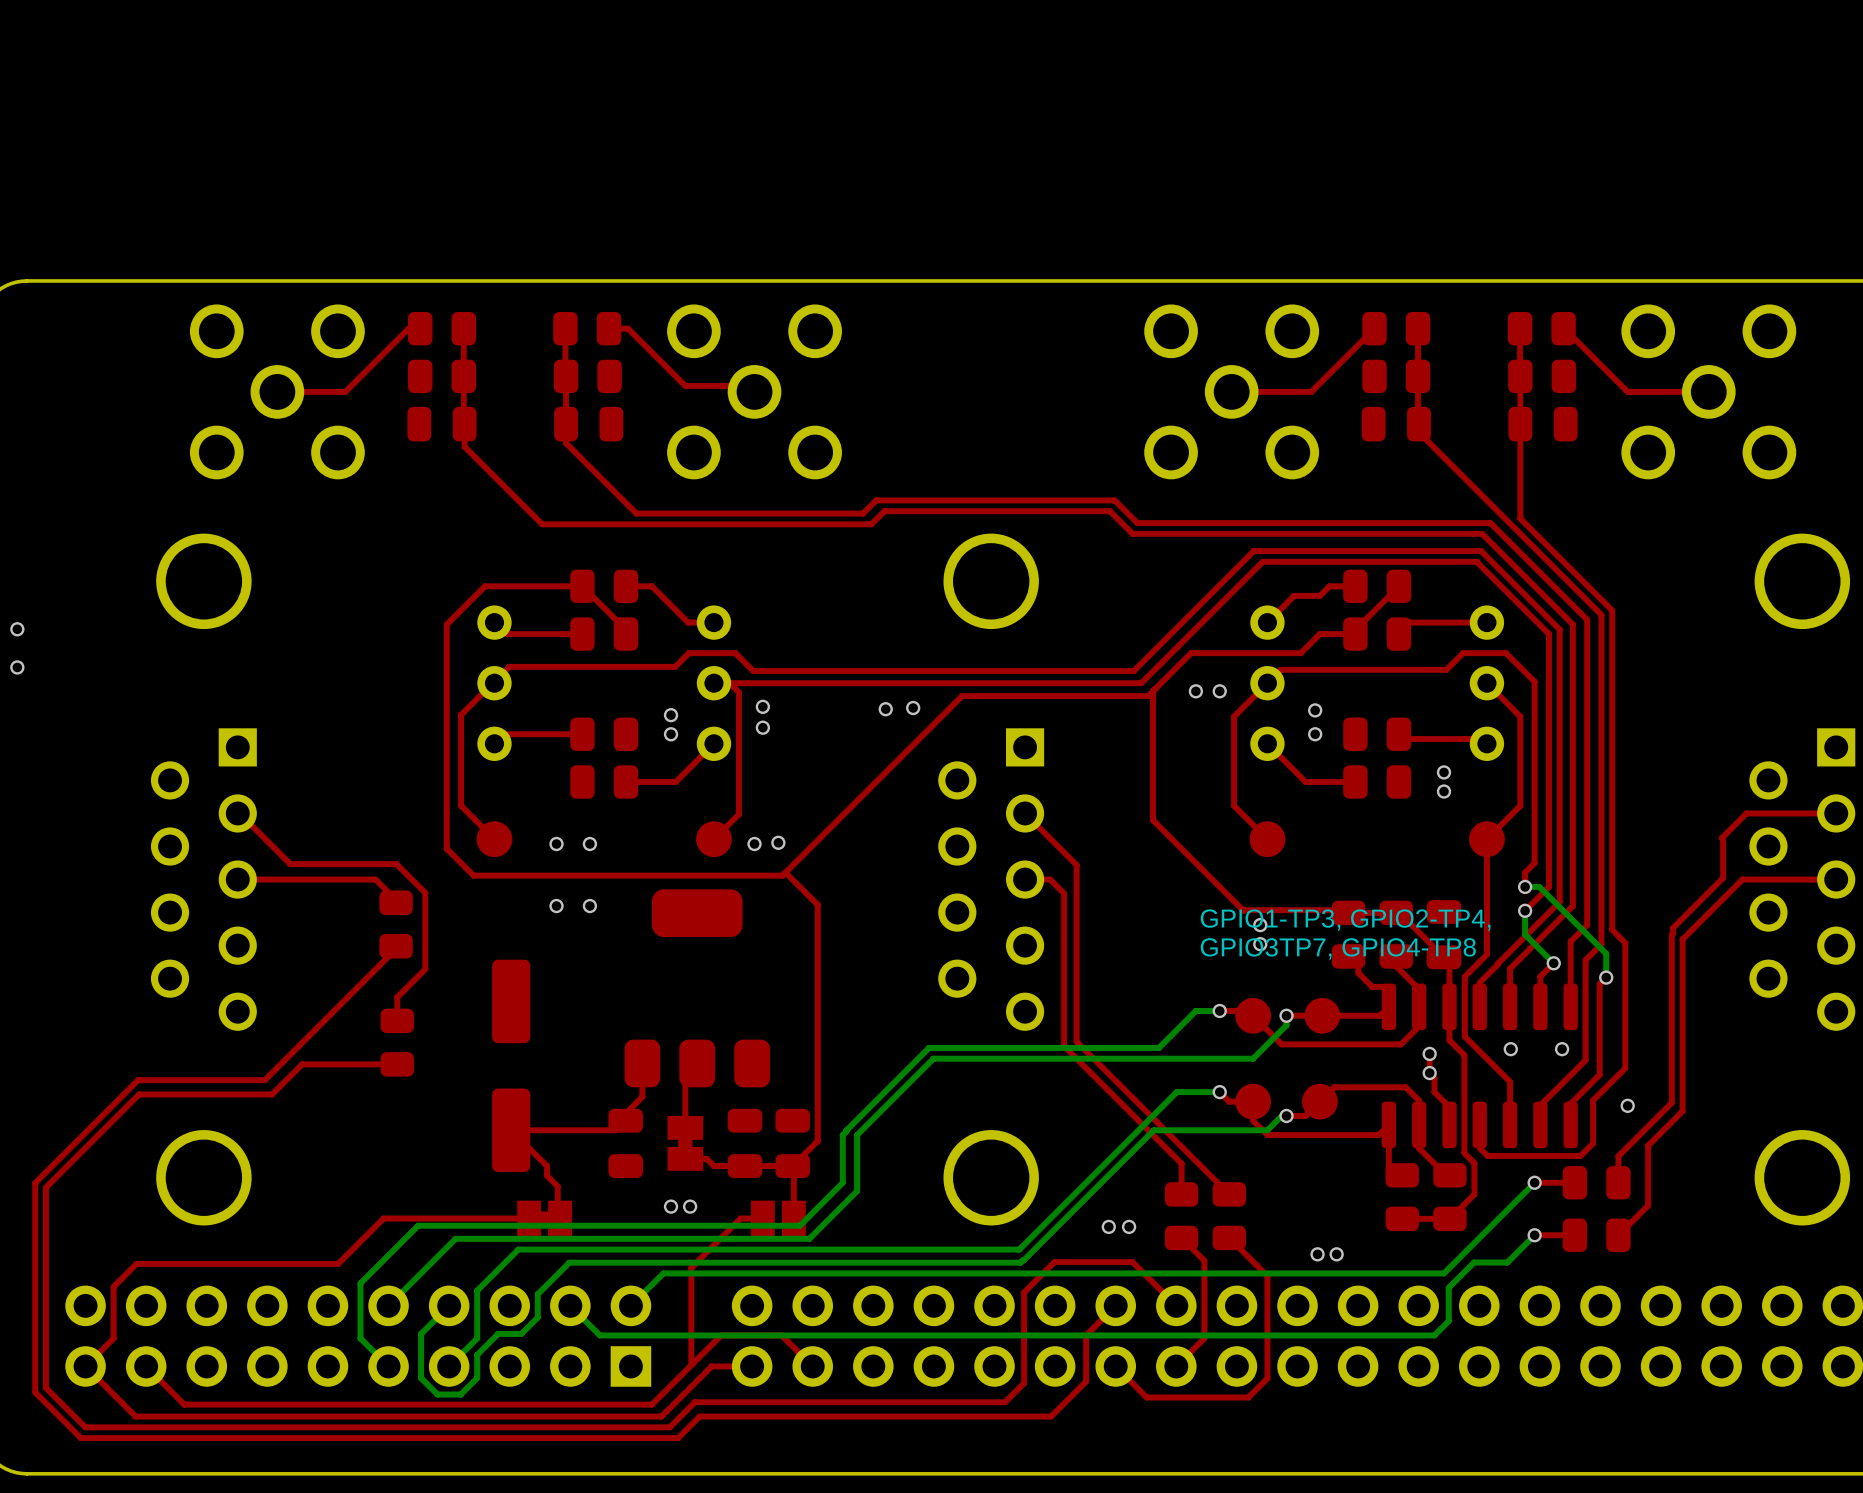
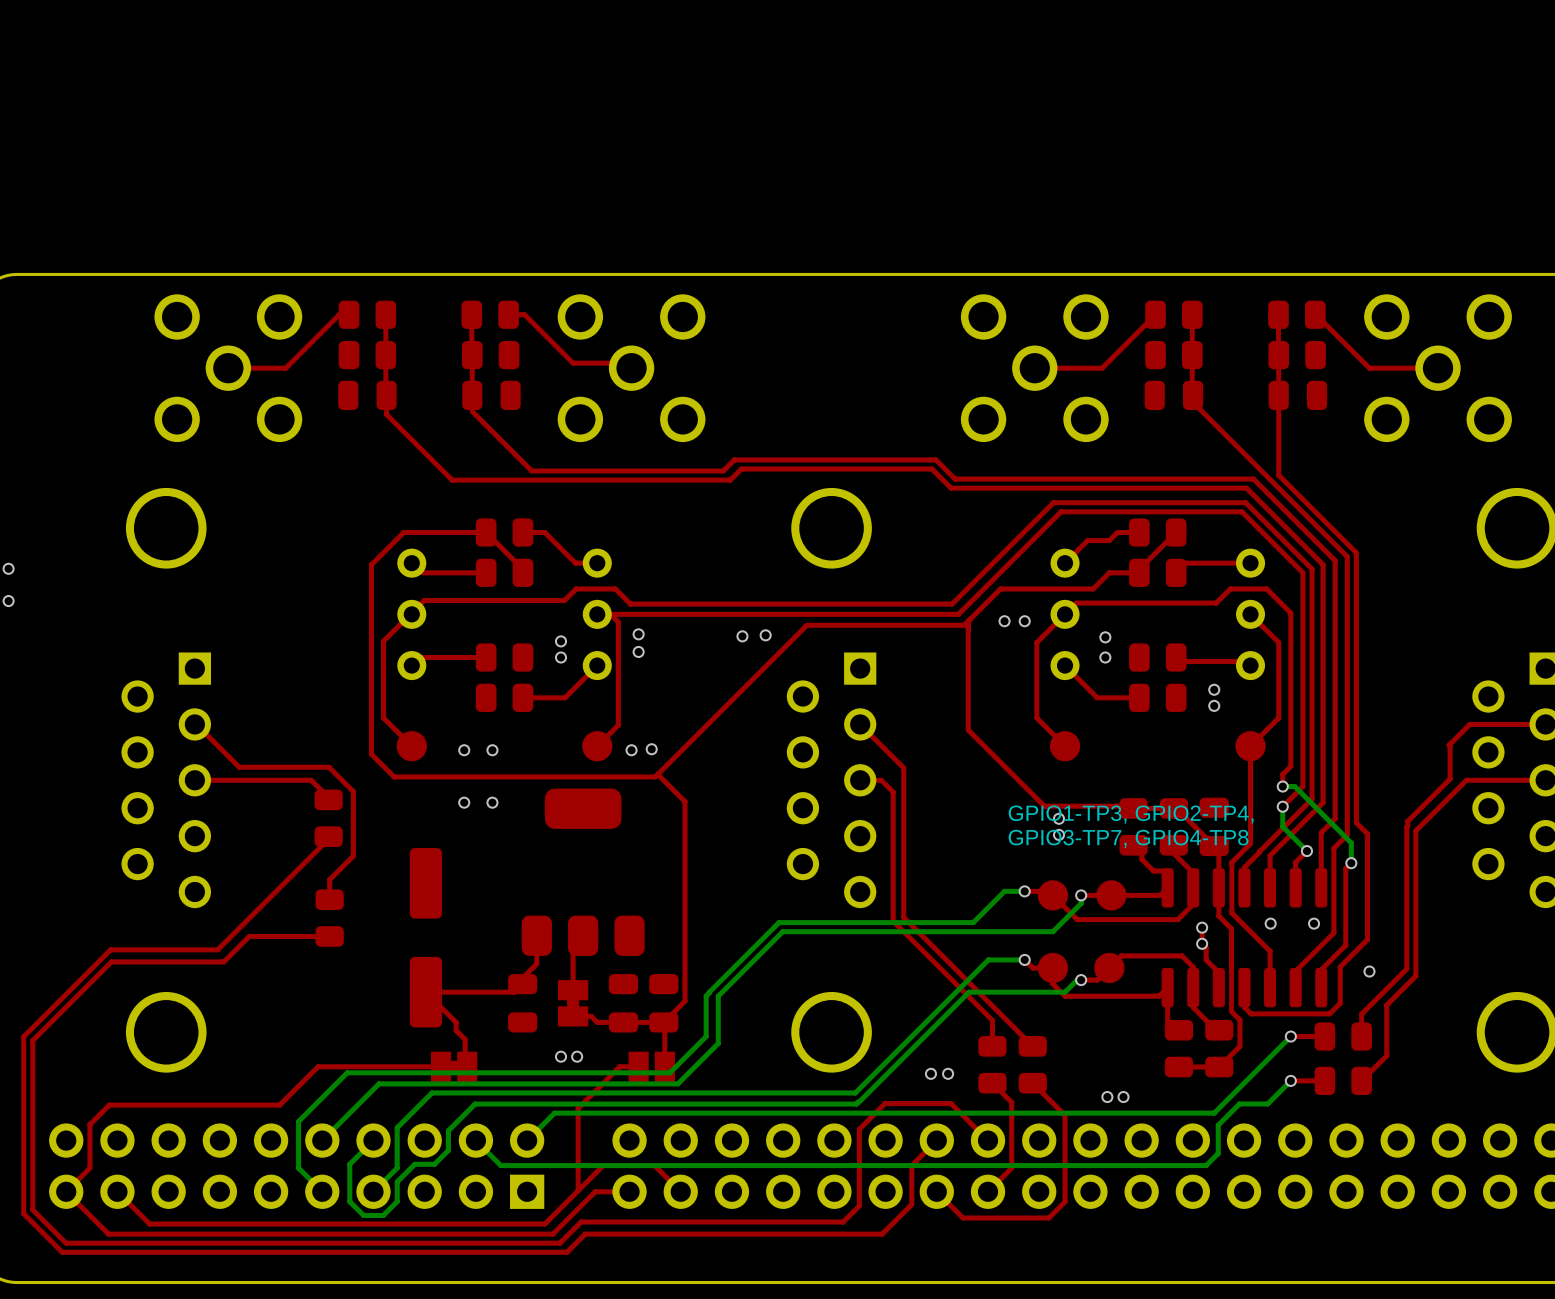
text: GPIO3TP7, GPIO4-TP8 (1338, 948) -> GPIO3-TP7, GPIO4-TP8 (1128, 838)

